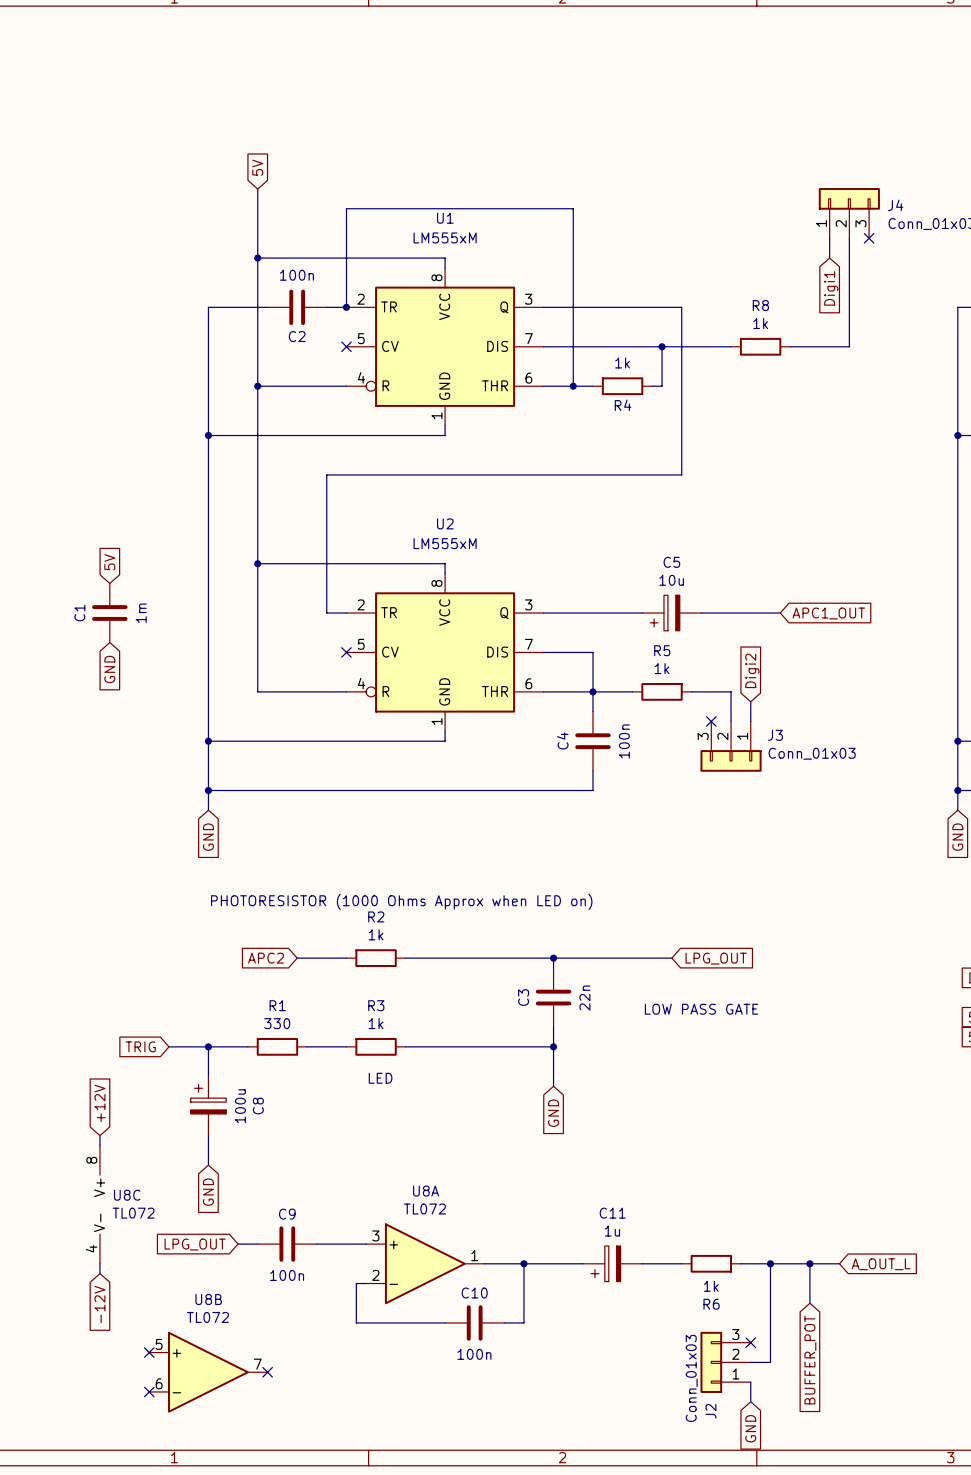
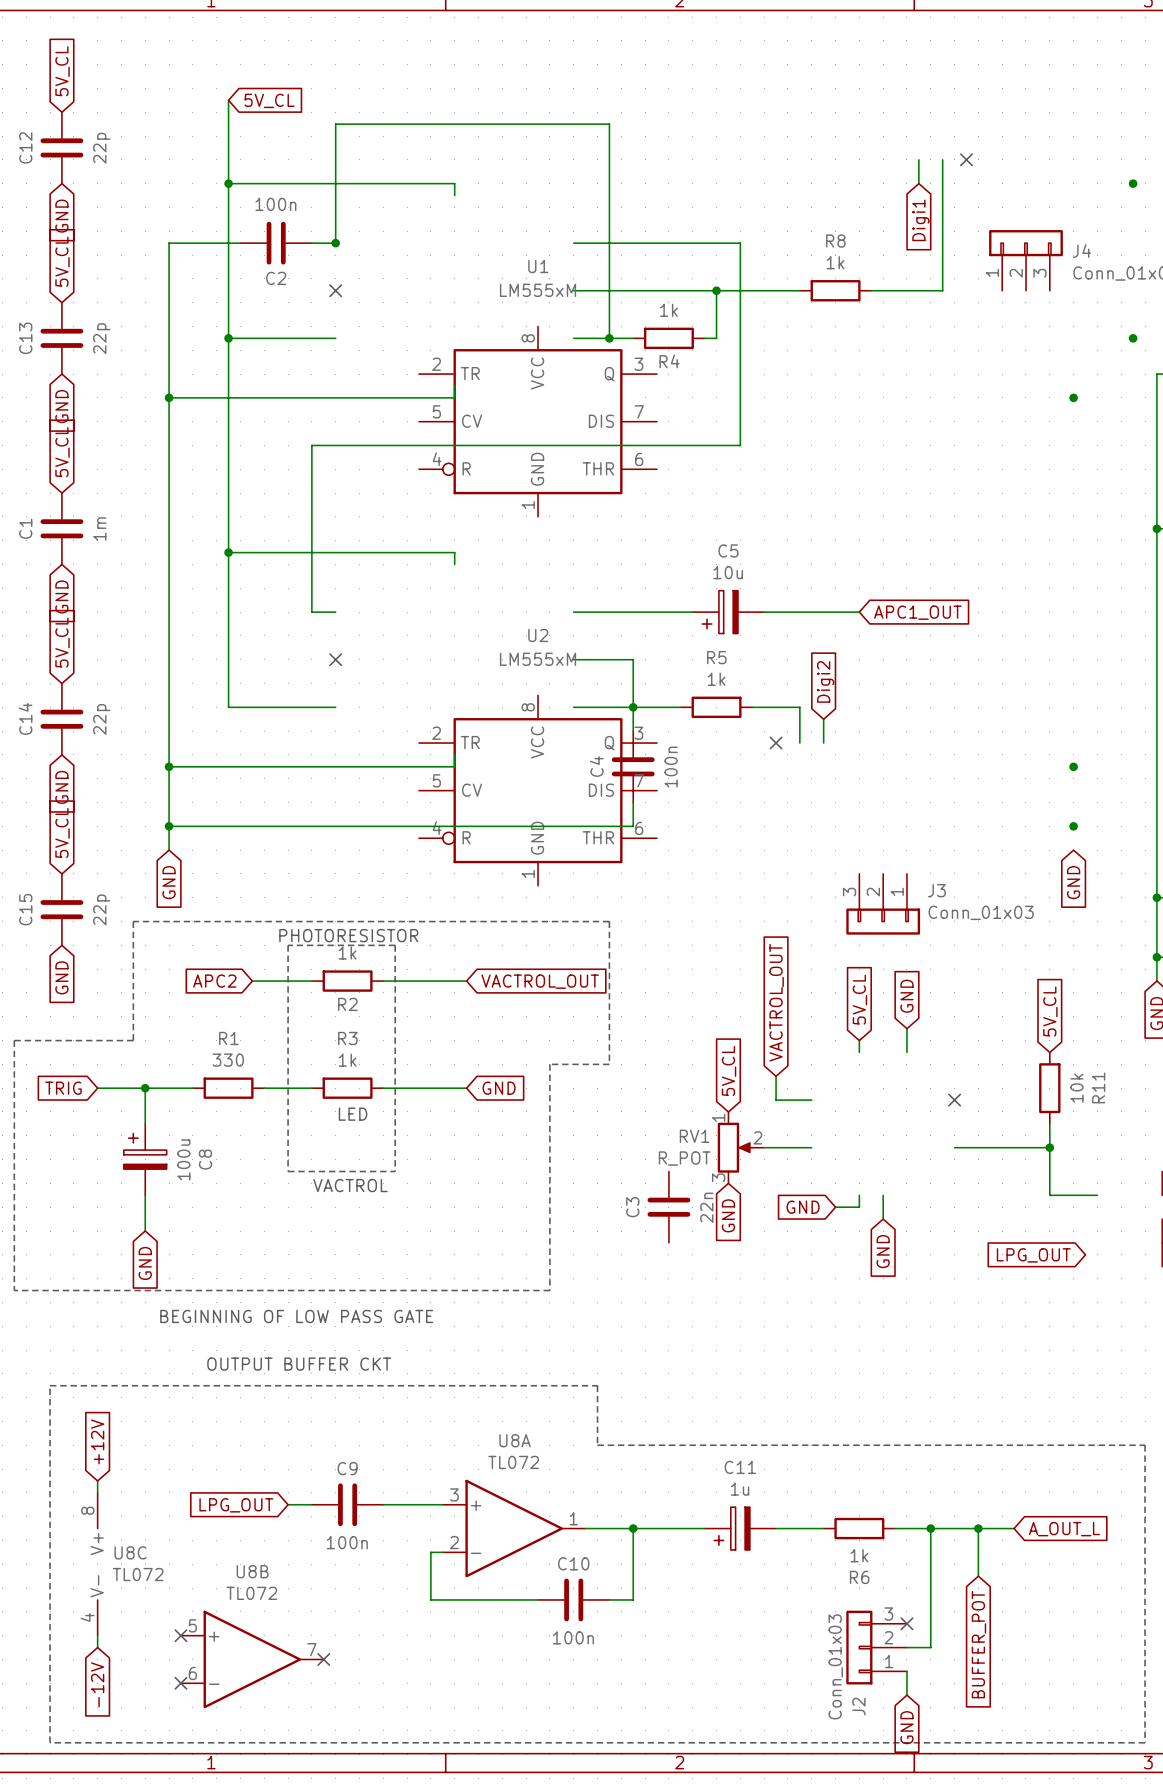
global label: none -> 5V_CL (62, 71)
wire: none -> (228, 100) (228, 707) (335, 707)
global label: none -> 5V_CL (269, 100)
C12: none -> 22p (61, 147)
no-connect mark: none -> (966, 159)
junction: none -> (228, 183)
junction: none -> (1133, 183)
global label: 5V (257, 167) -> none
global label: none -> GND (61, 216)
wire: (257, 189) (257, 366) -> (573, 243) (740, 243) (740, 445) (311, 445)
wire: none -> (240, 243) (169, 243) (169, 850)
junction: none -> (335, 243)
global label: none -> 5V_CL (62, 261)
no-connect mark: none -> (335, 290)
junction: none -> (716, 290)
wire: (829, 238) (829, 258) -> (918, 159) (918, 183)
wire: (849, 238) (849, 346) (790, 346) -> (942, 159) (942, 290) (871, 290)
no-connect mark: (869, 238) -> none
wire: (257, 258) (445, 258) (445, 267) -> (228, 183) (454, 183) (454, 195)
junction: (257, 258) -> none
C13: none -> 22p (61, 338)
junction: none -> (228, 338)
junction: none -> (609, 338)
junction: none -> (1133, 338)
global label position: Digi1 (831, 288) -> Digi1 (920, 220)
wire: (267, 307) (208, 307) (208, 810) -> (311, 981) (252, 981)
C2 position: (297, 307) -> (276, 243)
wire: (326, 307) (346, 307) (346, 208) (573, 208) (573, 386) -> (311, 243) (335, 243) (335, 124) (609, 124) (609, 338)
junction: (346, 307) -> none
wire: (543, 307) (681, 307) (681, 474) (326, 474) (326, 613) (346, 613) -> none
junction: none -> (169, 397)
junction: none -> (1073, 397)
global label: none -> GND (61, 406)
no-connect mark: (346, 346) -> none
wire: (543, 346) (731, 346) -> (573, 290) (799, 290)
wire: (662, 346) (662, 386) (652, 386) -> (716, 290) (716, 338) (704, 338)
junction: (662, 346) -> none
R8 position: (760, 346) -> (835, 290)
global label: none -> 5V_CL (62, 452)
wire: (257, 386) (346, 386) -> (228, 338) (335, 338)
junction: (257, 386) -> none
wire: (543, 386) (592, 386) -> (573, 338) (633, 338)
junction: (573, 386) -> none
R4 position: (622, 386) -> (668, 338)
wire: (445, 425) (445, 435) (208, 435) -> (454, 385) (454, 397) (169, 397)
junction position: (208, 435) -> (228, 552)
global label: none -> GND (61, 596)
wire: (257, 504) (257, 691) (346, 691) -> (311, 612) (335, 612)
global label: none -> 5V_CL (62, 642)
no-connect mark: none -> (335, 659)
global label: 5V (109, 562) -> none
wire: (257, 563) (445, 563) (445, 573) -> (228, 552) (454, 552) (454, 564)
junction: (257, 563) -> none
junction: none -> (633, 707)
C14: none -> 22p (61, 719)
C1 position: (109, 613) -> (61, 528)
wire: (543, 613) (642, 613) -> (573, 612) (692, 612)
no-connect mark: none -> (776, 743)
C5 position: (671, 613) -> (728, 612)
wire: (701, 613) (780, 613) -> (764, 612) (859, 612)
global label position: APC1_OUT (828, 613) -> APC1_OUT (917, 612)
junction: none -> (169, 766)
junction: none -> (1073, 766)
global label: none -> GND (61, 787)
no-connect mark: (346, 652) -> none
wire: (543, 652) (592, 652) (592, 711) -> (573, 659) (633, 659) (633, 731)
global label: GND (109, 669) -> none
global label position: Digi2 (752, 670) -> Digi2 (825, 681)
junction: none -> (169, 826)
junction: none -> (1073, 826)
global label: none -> 5V_CL (62, 832)
wire: (543, 691) (632, 691) -> (573, 707) (680, 707)
junction: (592, 691) -> none
R5 position: (662, 691) -> (716, 707)
wire: (691, 691) (731, 691) (731, 721) -> (752, 707) (799, 707) (799, 743)
wire: (750, 701) (750, 721) -> (823, 719) (823, 743)
no-connect mark: (711, 721) -> none
global label: none -> GND (169, 882)
global label: none -> GND (1073, 882)
wire: (445, 731) (445, 741) (208, 741) -> (454, 754) (454, 766) (169, 766)
junction: (208, 741) -> none
C4 position: (592, 741) -> (633, 766)
C15: none -> 22p (61, 909)
line: none -> (133, 921) (609, 921) (609, 1064) (549, 1064) (549, 1290) (14, 1290) (14, 1040) (133, 1040) (133, 921)
wire: (592, 770) (592, 790) (208, 790) -> (633, 802) (633, 826) (169, 826)
text: none -> PHOTORESISTOR (348, 935)
line: none -> (288, 945) (395, 945) (395, 1171) (288, 1171) (288, 945)
junction: (208, 790) -> none
global label: none -> GND (61, 977)
wire: none -> (383, 981) (466, 981)
global label: none -> VACTROL_OUT (540, 981)
global label: none -> GND (906, 996)
global label: none -> 5V_CL (859, 999)
global label: none -> VACTROL_OUT (776, 1002)
global label: none -> 5V_CL (1050, 1011)
global label: GND (208, 837) -> APC2 (214, 981)
wire: none -> (906, 1028) (906, 1052)
global label: none -> 5V_CL (729, 1071)
wire: none -> (776, 1076) (776, 1100) (811, 1100)
junction: none -> (145, 1088)
wire: none -> (383, 1088) (466, 1088)
global label: none -> GND (499, 1088)
R11: none -> 10k (1049, 1088)
text: PHOTORESISTOR (1000 Ohms Approx when LED on) (401, 901) -> none
no-connect mark: none -> (954, 1100)
R2 name position: R2 (376, 916) -> R2 (347, 1004)
wire: none -> (1049, 1123) (1049, 1195) (1097, 1195)
RV1: none -> R_POT (740, 1147)
wire: none -> (764, 1147) (811, 1147)
wire: none -> (954, 1147) (1049, 1147)
junction: none -> (1049, 1147)
global label: APC2 (266, 958) -> none
wire: (297, 958) (346, 958) -> none
R2 position: (376, 958) -> (347, 981)
wire: (405, 958) (671, 958) -> none
wire: (553, 958) (553, 967) -> (859, 1040) (859, 1052)
junction: (553, 958) -> none
global label: LPG_OUT (716, 958) -> none
text: none -> VACTROL (350, 1185)
wire: none -> (859, 1195) (859, 1207) (835, 1207)
wire: none -> (883, 1195) (883, 1219)
global label: none -> GND (803, 1207)
global label: none -> GND (728, 1215)
text: LOW PASS GATE (701, 1009) -> none
wire: (553, 1027) (553, 1086) -> none
global label: none -> GND (883, 1251)
global label: none -> LPG_OUT (1033, 1255)
global label: none -> GND (145, 1263)
global label position: TRIG (140, 1046) -> TRIG (63, 1088)
wire: (168, 1046) (247, 1046) -> (97, 1088) (192, 1088)
wire: (208, 1046) (208, 1076) -> (145, 1088) (145, 1123)
junction: (208, 1046) -> none
R1 position: (277, 1046) -> (228, 1088)
wire: (307, 1046) (346, 1046) -> (264, 1088) (311, 1088)
R3 position: (376, 1046) -> (347, 1088)
wire: (405, 1046) (553, 1046) -> none
junction: (553, 1046) -> none
text position: LED (380, 1078) -> LED (353, 1114)
text: none -> BEGINNING OF LOW PASS GATE (296, 1316)
global label position: +12V (99, 1103) -> +12V (97, 1441)
C8 position: (208, 1106) -> (145, 1159)
global label: GND (553, 1113) -> none
text: none -> OUTPUT BUFFER CKT (299, 1364)
wire: (99, 1135) (99, 1145) -> (97, 1480) (97, 1492)
wire: (208, 1135) (208, 1165) -> (145, 1195) (145, 1231)
line: none -> (50, 1385) (50, 1742) (1145, 1742) (1145, 1445) (597, 1445) (597, 1385) (50, 1385)
global label: GND (208, 1192) -> none
U8C position: (99, 1204) -> (97, 1564)
wire: (99, 1263) (99, 1273) -> (97, 1635) (97, 1647)
global label position: -12V (99, 1304) -> -12V (97, 1684)

